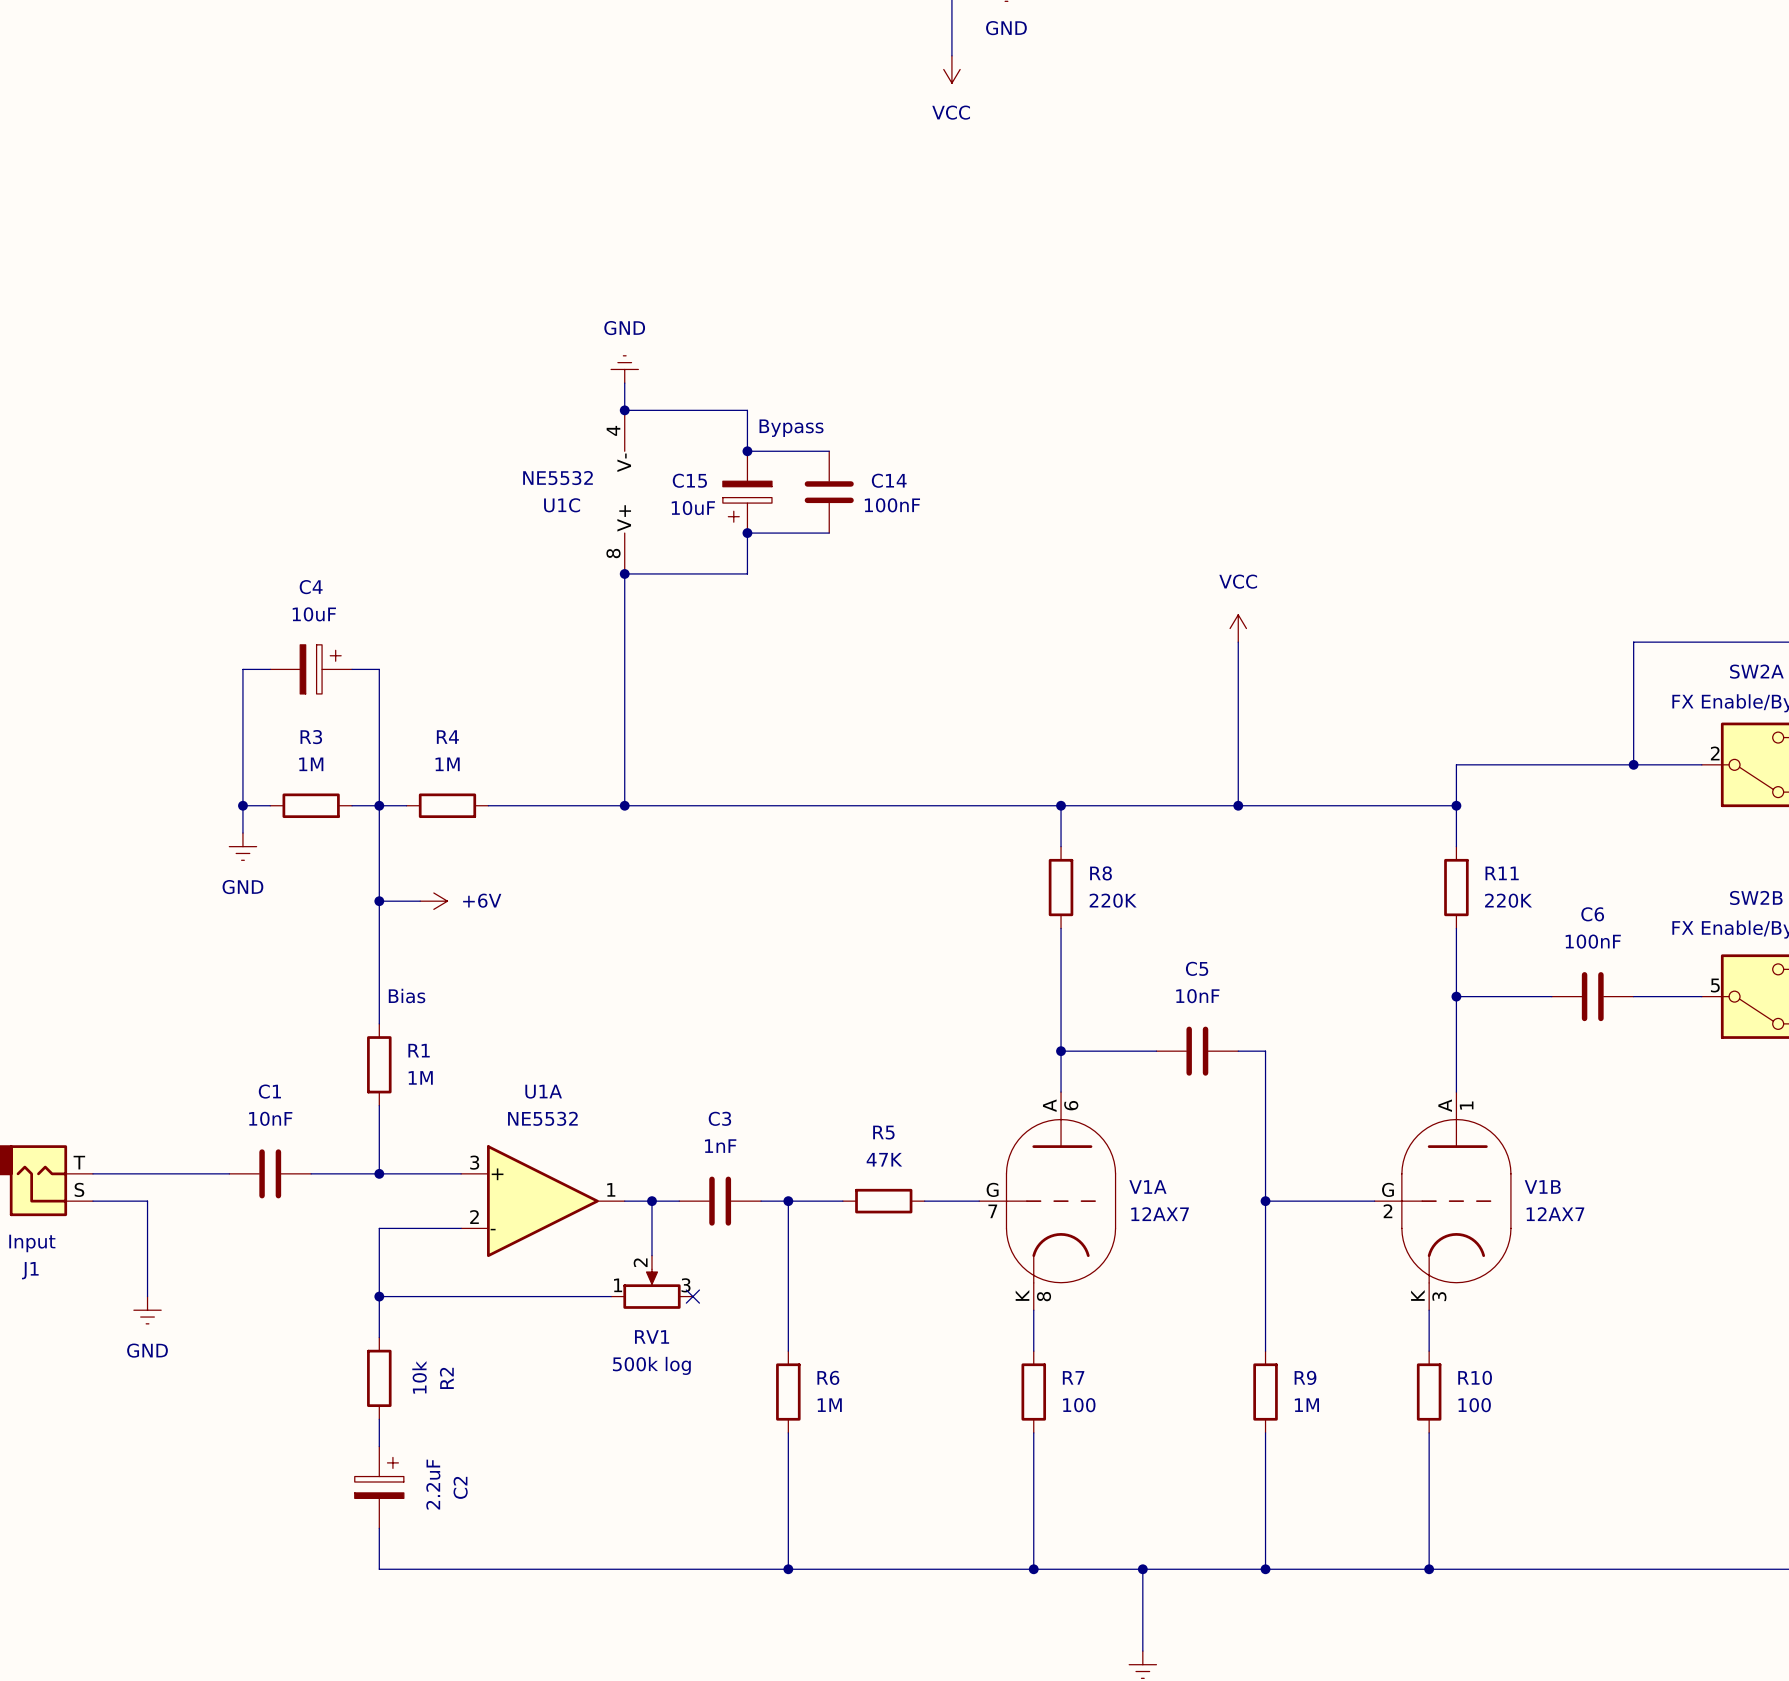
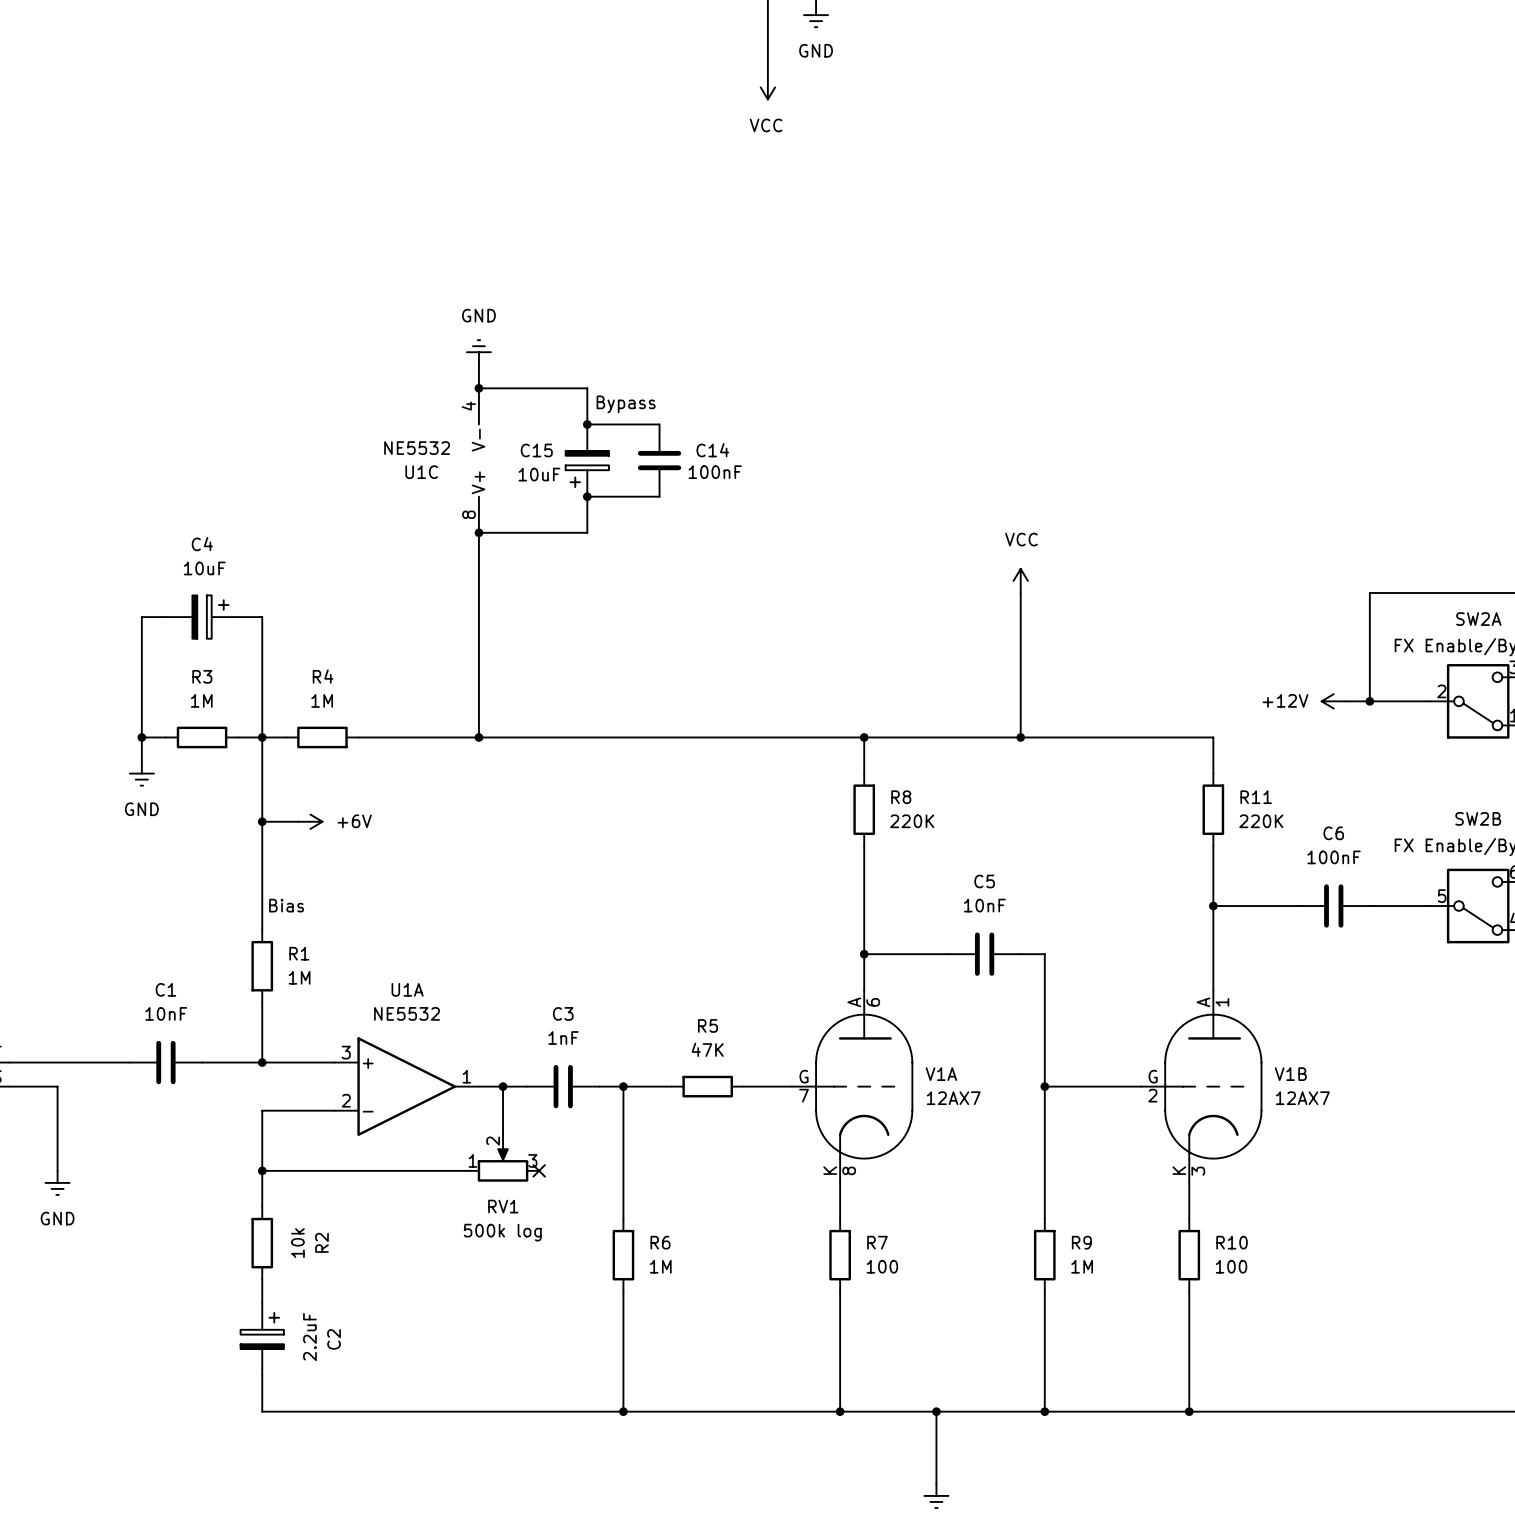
power symbol: none -> +12V (1333, 701)
wire: (1606, 764) (1456, 764) (1456, 805) -> none
junction: (1456, 805) -> none

